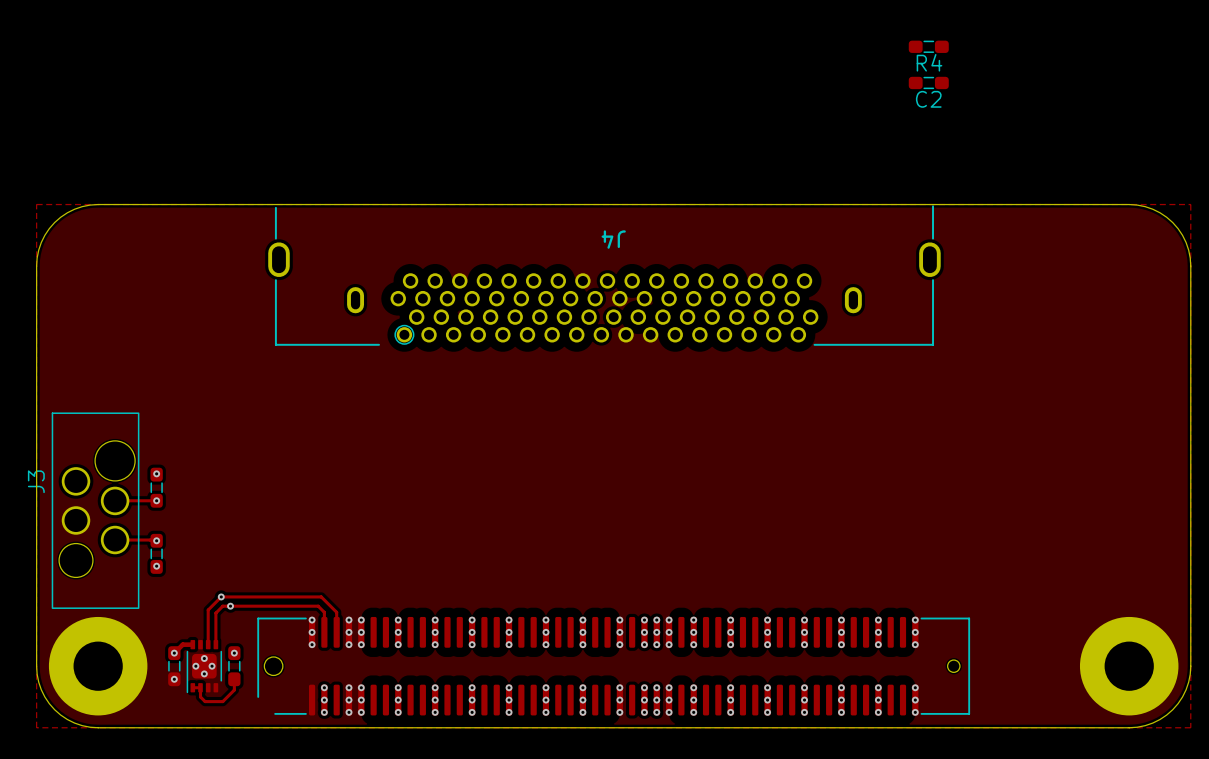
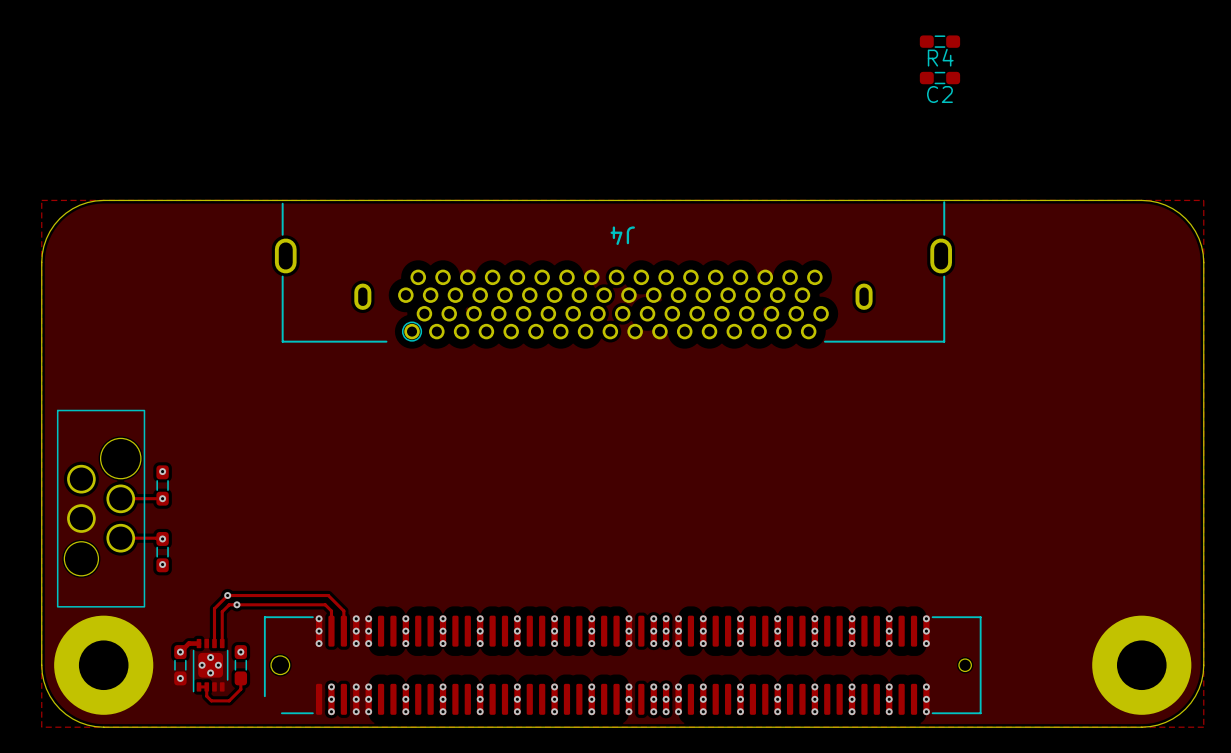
J3 name: J3 (36, 481) -> none

